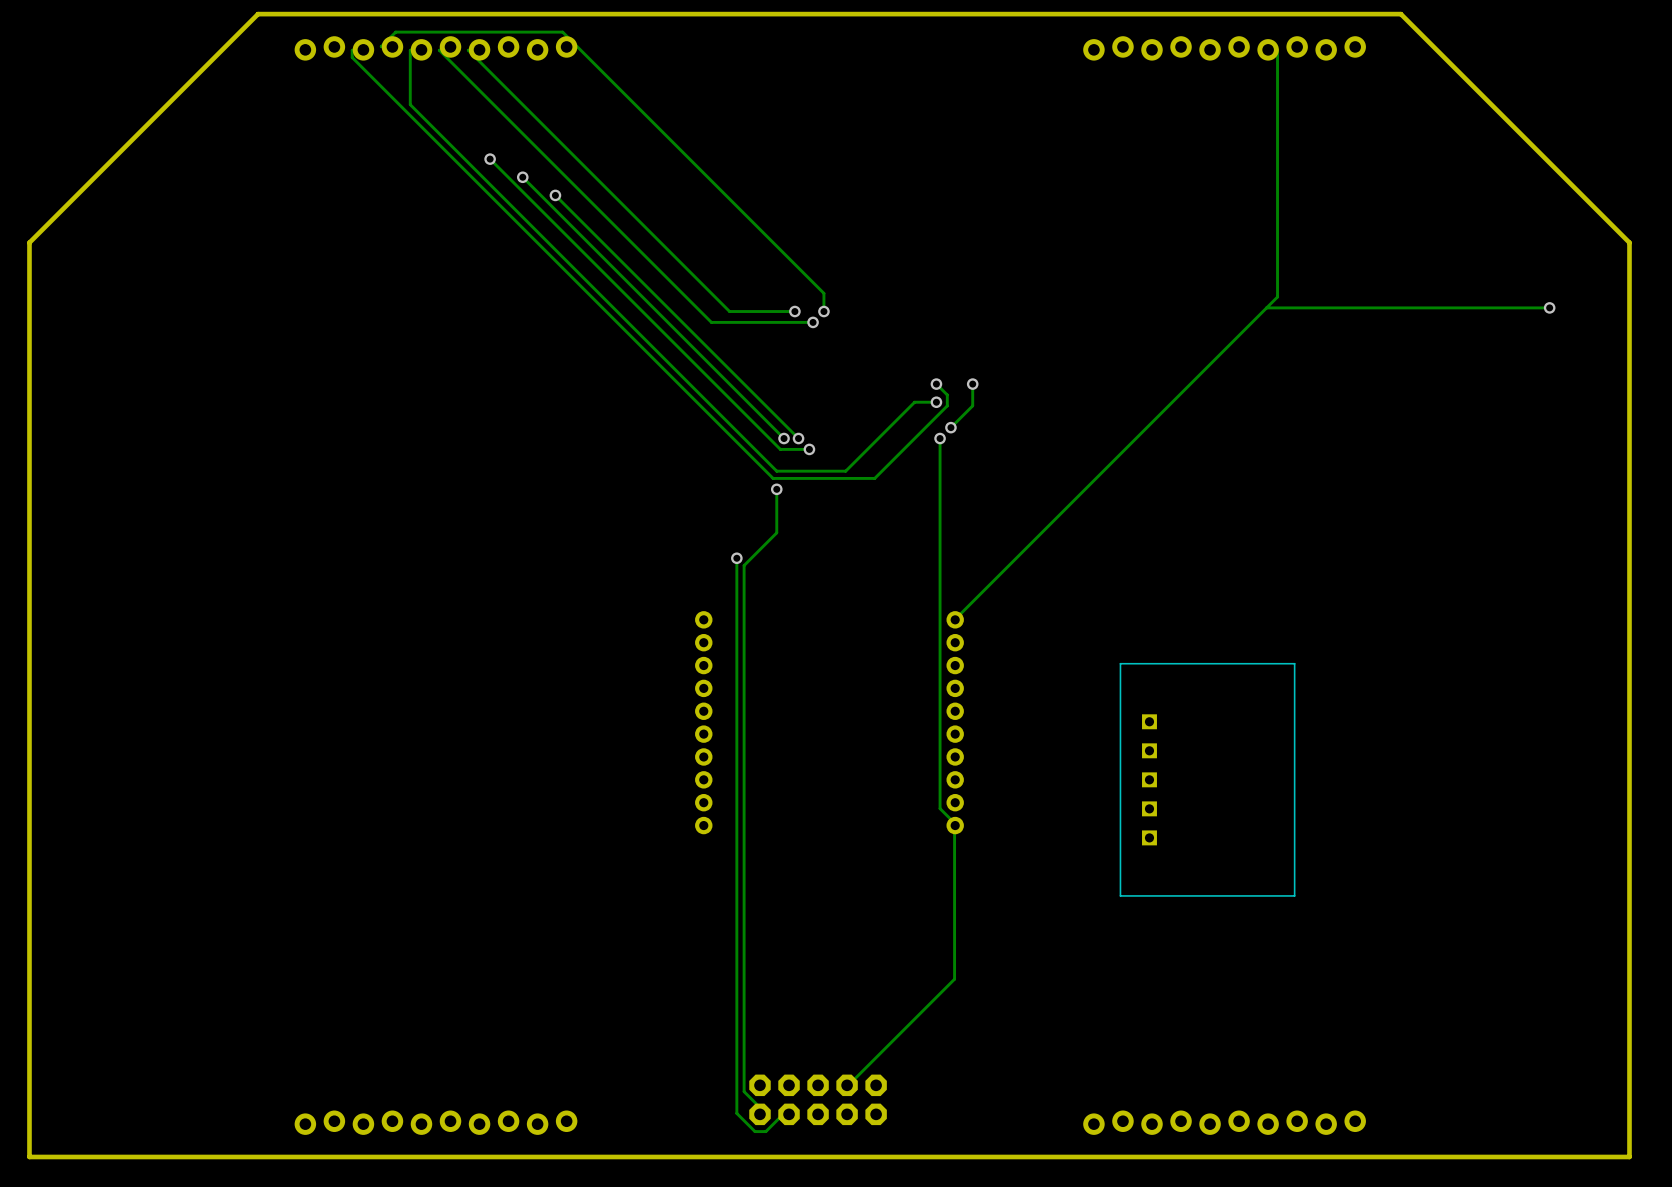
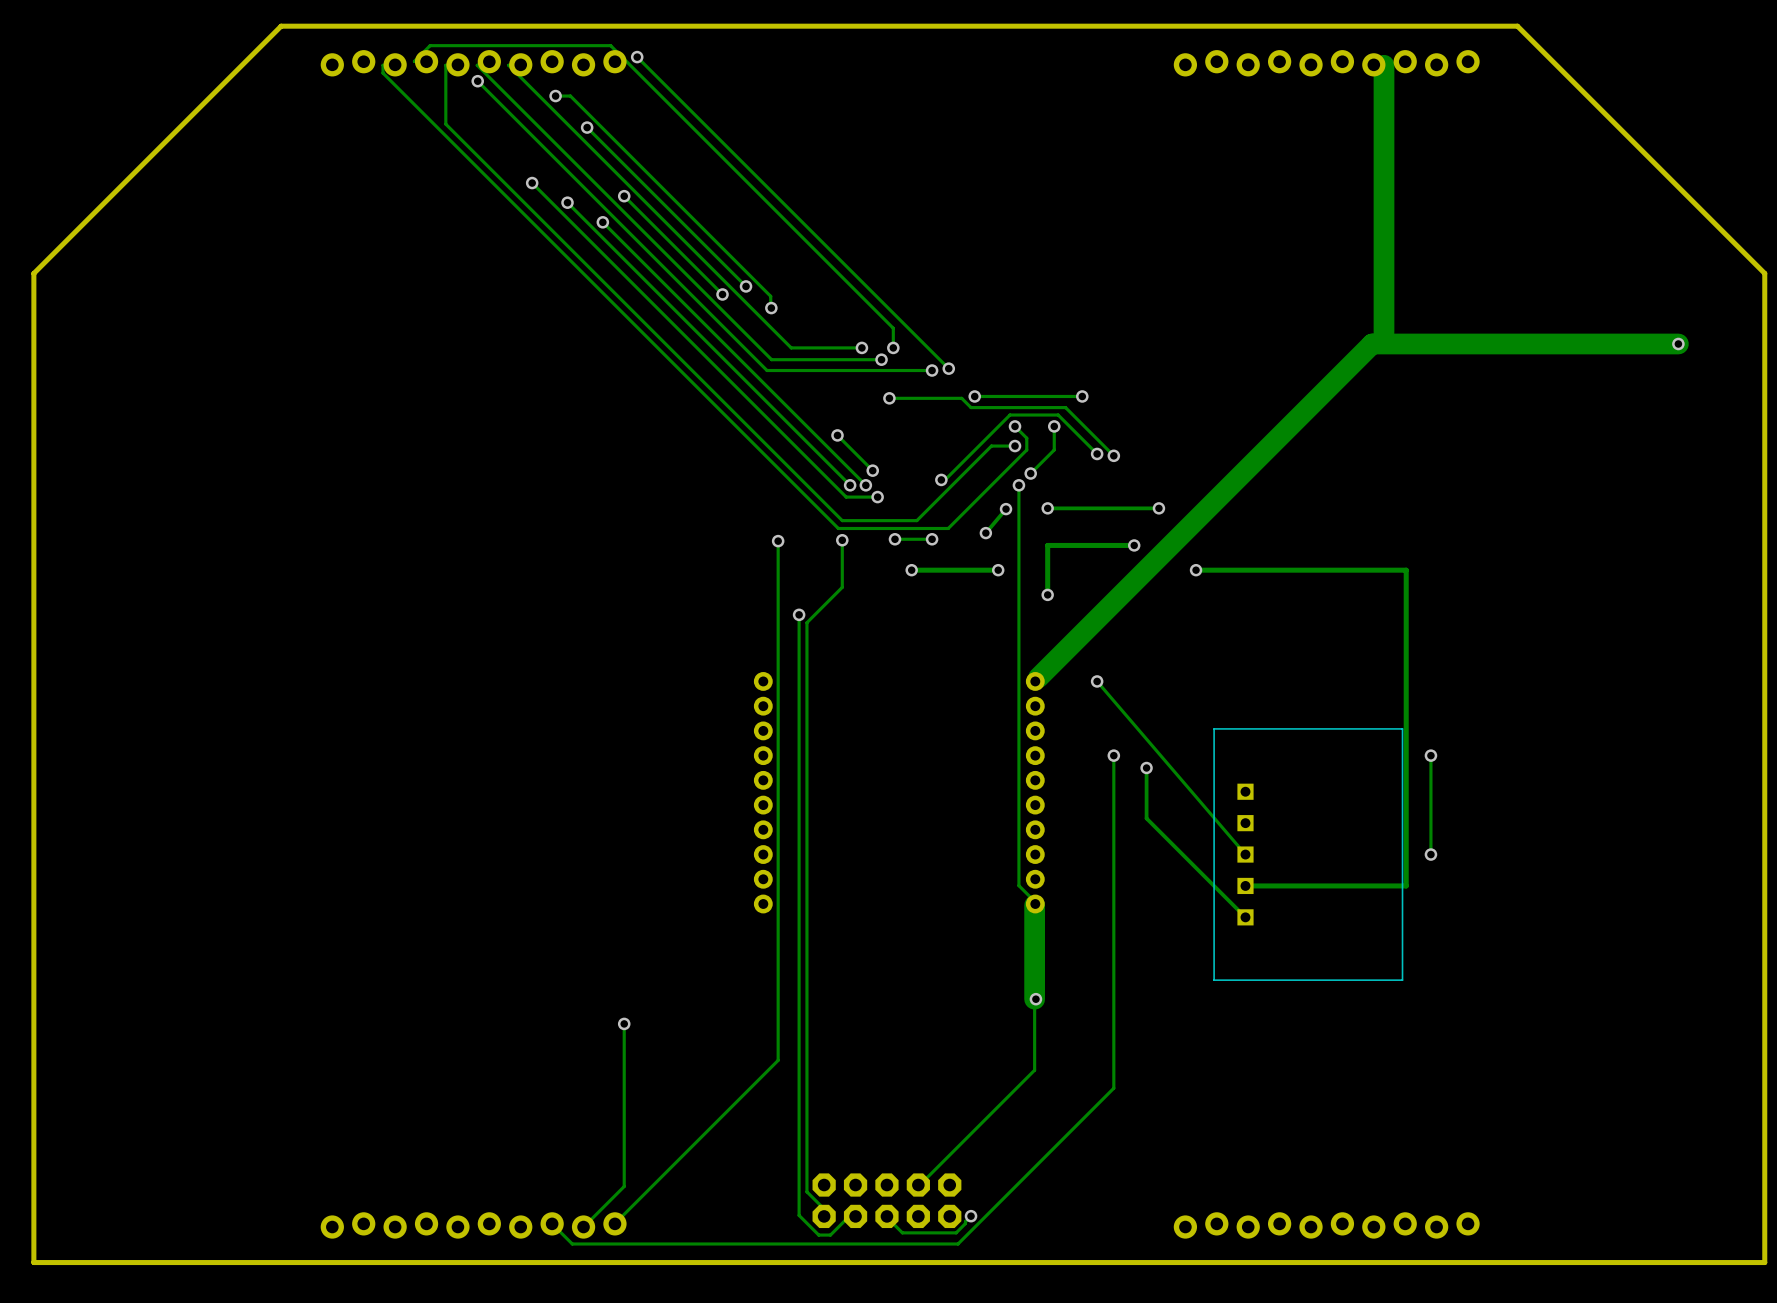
track: none -> (637, 57) (948, 368)
via: none -> (637, 57)
track width: thin (1277, 50) (1277, 297) -> thick (1383, 65) (1383, 332)
track: none -> (477, 81) (767, 370) (932, 370)
via: none -> (477, 81)
track: none -> (555, 96) (570, 96) (770, 296) (771, 308)
via: none -> (555, 96)
track: none -> (587, 127) (746, 286)
via: none -> (587, 127)
track: none -> (624, 196) (722, 294)
via: none -> (624, 196)
via: none -> (746, 286)
via: none -> (722, 294)
via: none -> (771, 308)
track width: thin (1549, 307) (1266, 307) (958, 616) -> thick (1678, 343) (1372, 343) (1038, 677)
via: none -> (948, 368)
via: none -> (932, 370)
via: none -> (974, 396)
track: none -> (1082, 396) (974, 396)
via: none -> (1082, 396)
track: none -> (889, 398) (961, 398) (971, 407) (1065, 407) (1113, 455)
via: none -> (889, 398)
track: none -> (837, 435) (872, 470)
via: none -> (837, 435)
track: none -> (1097, 453) (1058, 415) (1009, 415) (945, 479) (941, 479)
via: none -> (1097, 453)
via: none -> (1113, 455)
via: none -> (872, 470)
via: none -> (941, 479)
via: none -> (1047, 508)
track: none -> (1158, 508) (1047, 508)
via: none -> (1158, 508)
track: none -> (1006, 509) (985, 533)
via: none -> (1006, 509)
via: none -> (985, 533)
via: none -> (894, 539)
track: none -> (932, 539) (894, 539)
via: none -> (932, 539)
track: none -> (778, 541) (778, 1060) (614, 1223)
via: none -> (778, 541)
track: none -> (1134, 545) (1047, 545) (1047, 594)
via: none -> (1134, 545)
via: none -> (911, 570)
track: none -> (998, 570) (911, 570)
via: none -> (998, 570)
track: none -> (1196, 570) (1406, 570) (1406, 885) (1245, 885)
via: none -> (1196, 570)
via: none -> (1047, 594)
track: none -> (1097, 681) (1245, 854)
via: none -> (1097, 681)
track: none -> (1113, 755) (1113, 1088) (958, 1243) (572, 1243) (552, 1223)
via: none -> (1113, 755)
track: none -> (1430, 755) (1430, 854)
via: none -> (1430, 755)
track: none -> (1146, 767) (1146, 818) (1245, 917)
via: none -> (1146, 767)
via: none -> (1430, 854)
track width: thin (954, 826) (954, 913) -> thick (1034, 905) (1034, 999)
via: none -> (1035, 999)
track: none -> (624, 1023) (624, 1186) (583, 1227)
via: none -> (624, 1023)
track: none -> (971, 1216) (956, 1232) (902, 1232) (886, 1216)
via: none -> (971, 1216)

